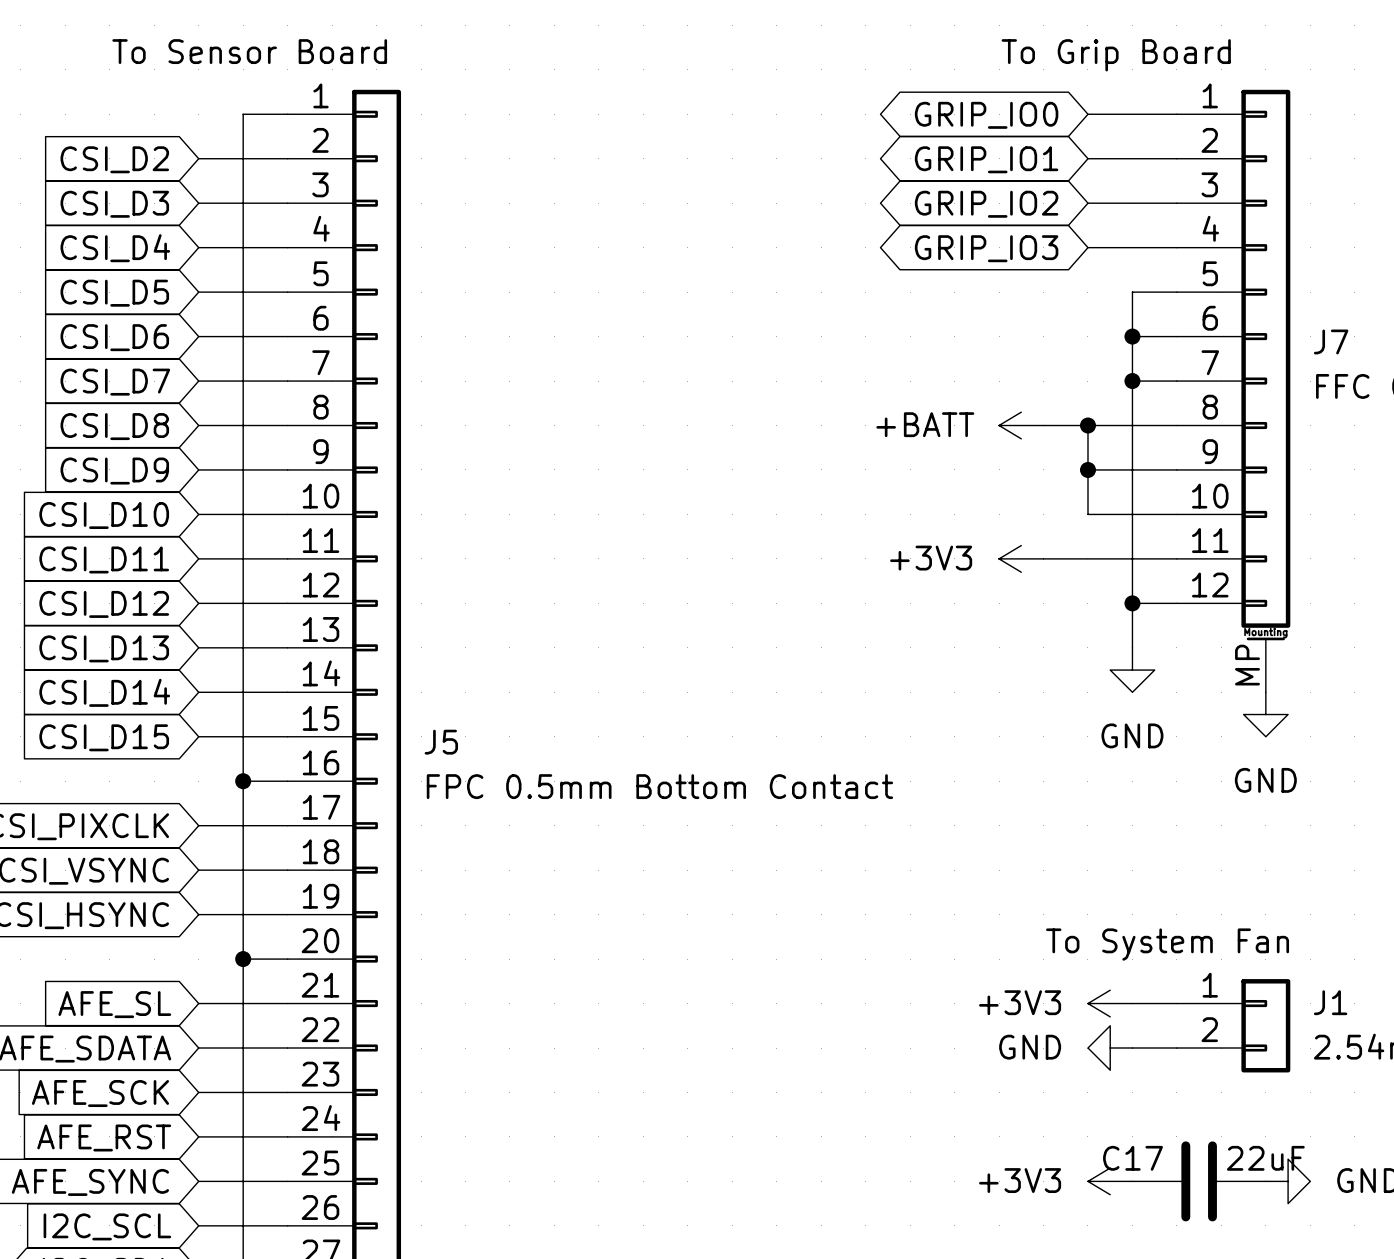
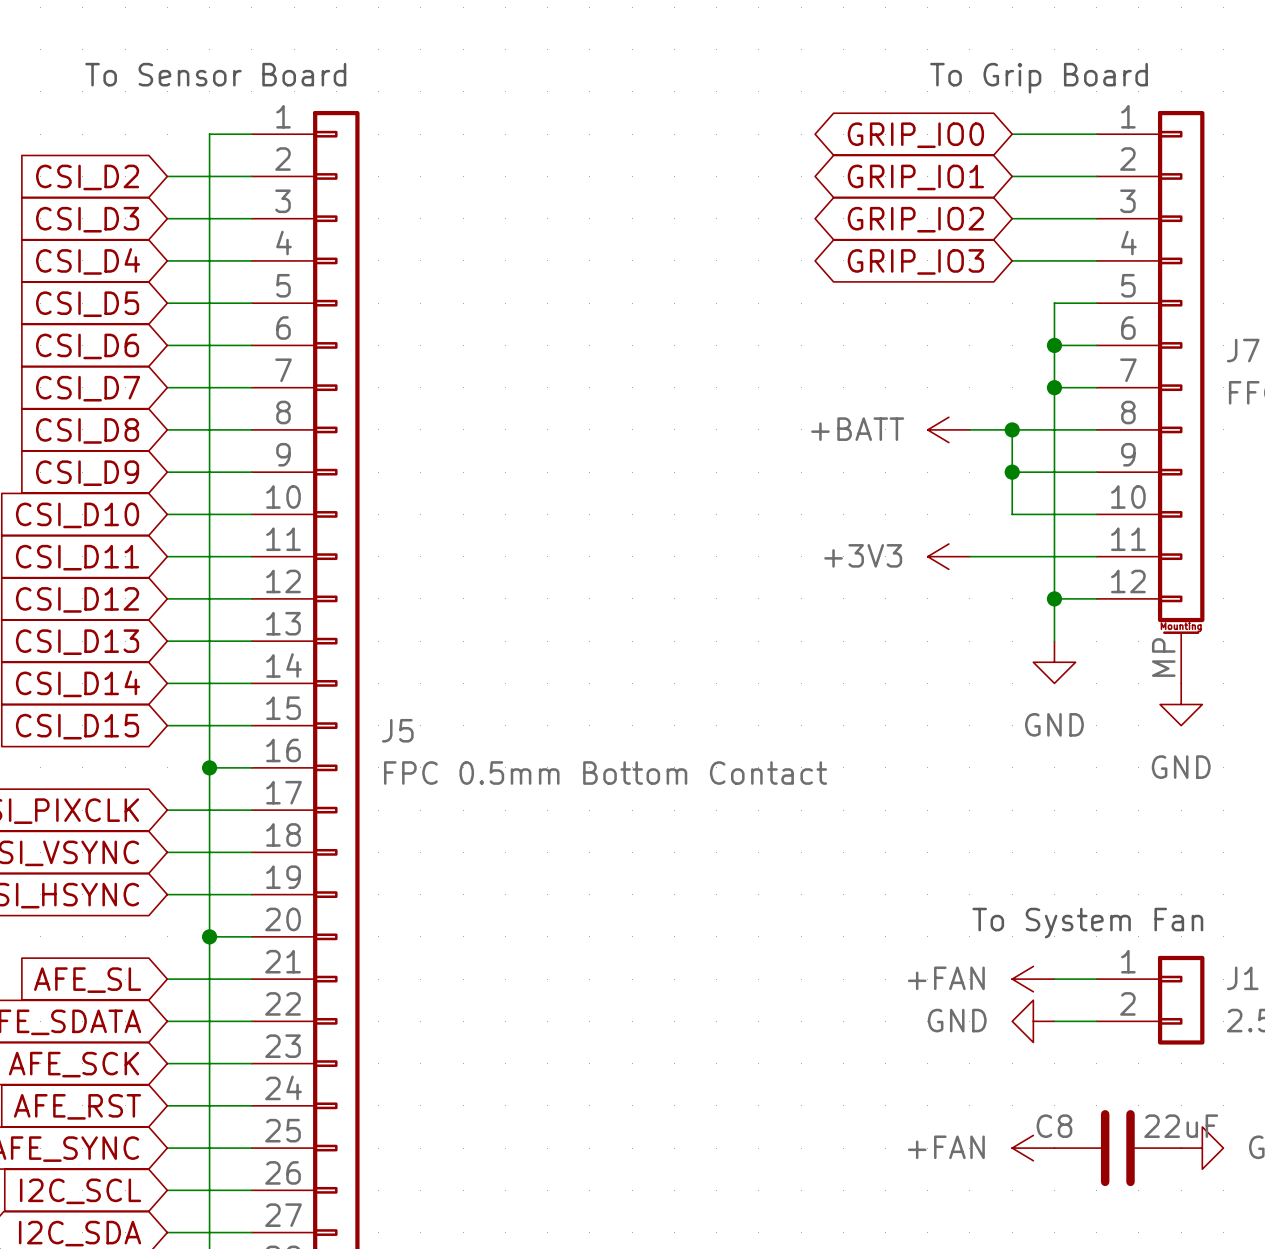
power symbol: +3V3 (1110, 1003) -> +FAN (1033, 979)
C17 name: C17 (1132, 1158) -> C8 (1054, 1126)
power symbol: +3V3 (1110, 1181) -> +FAN (1033, 1148)

